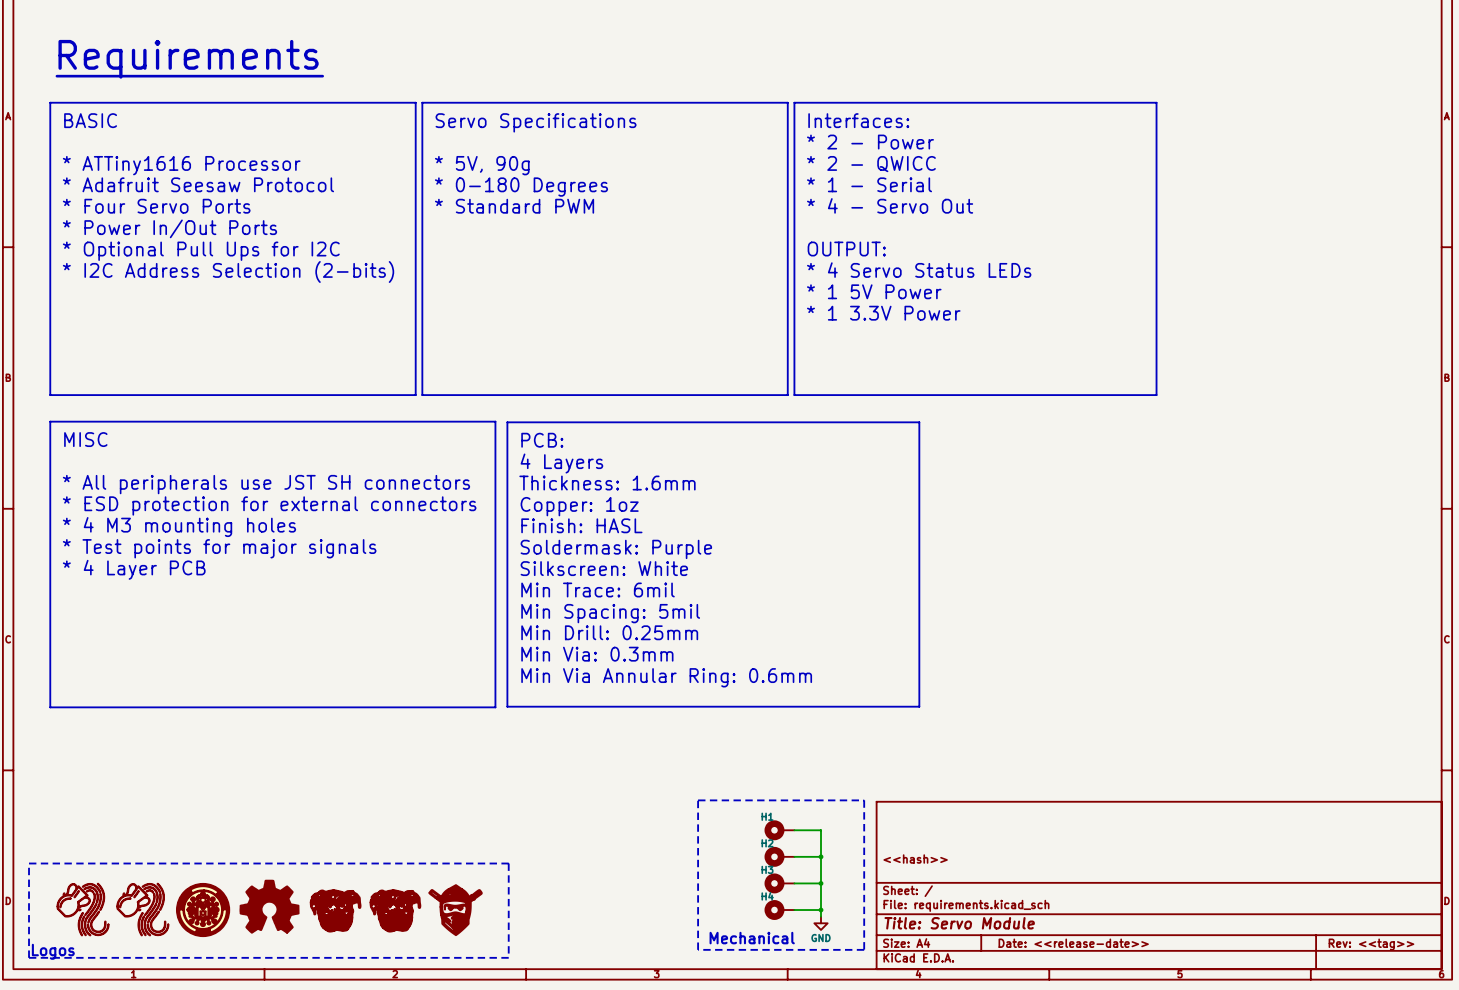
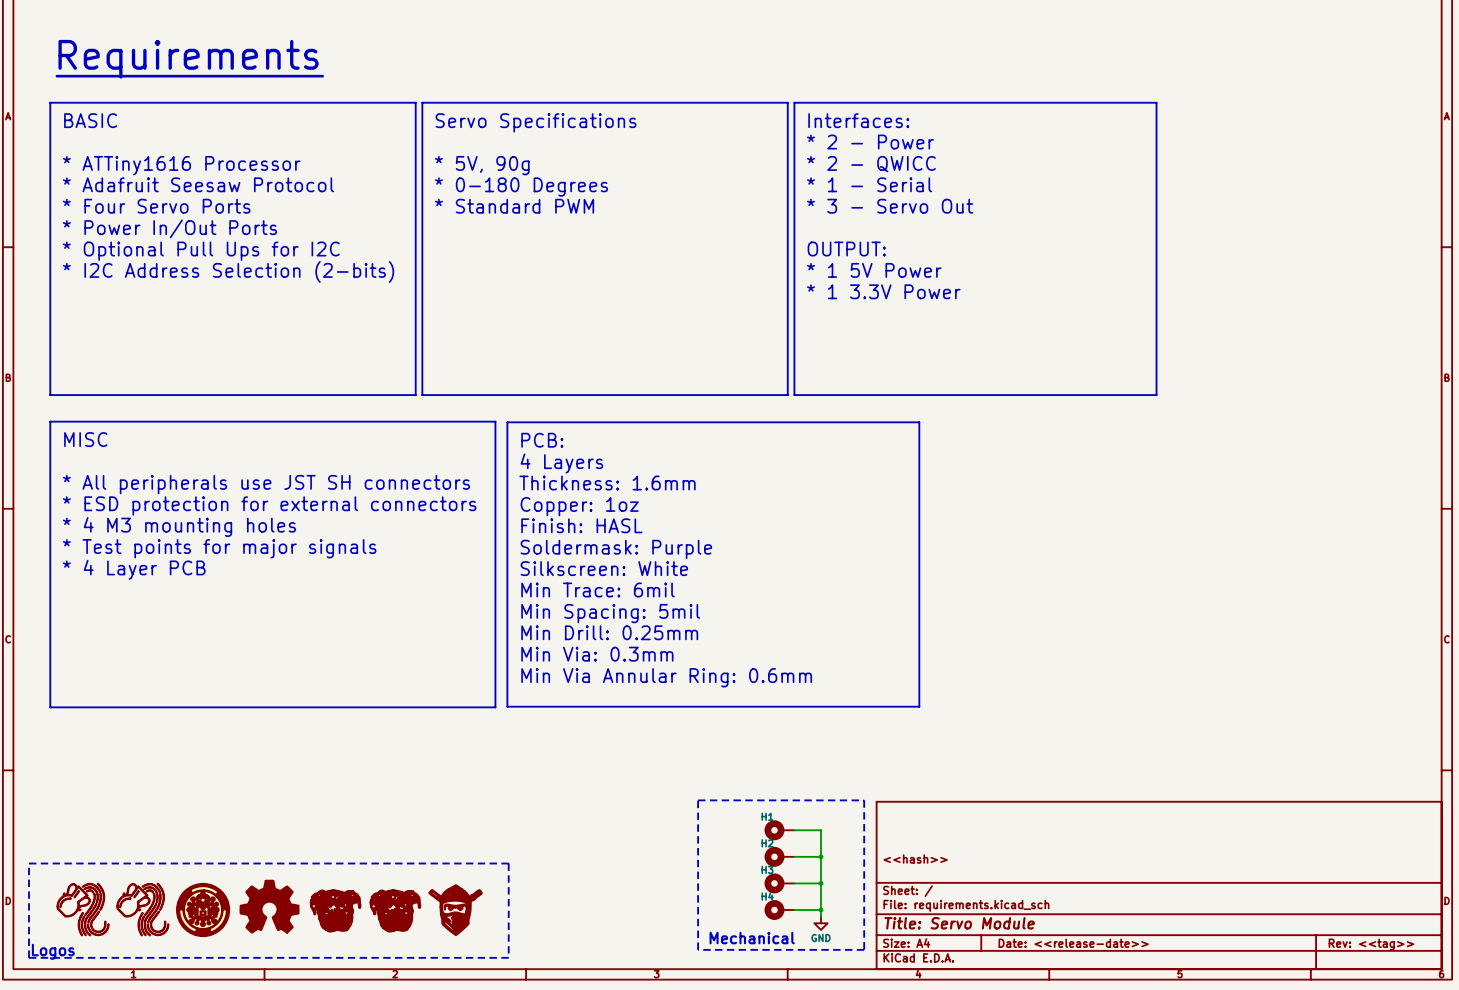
text: * 4 - Servo Out (890, 205) -> * 3 - Servo Out (890, 206)
text: * 4 Servo Status LEDs (919, 270) -> * 1 5V Power (874, 270)
text: * 1 5V Power (874, 291) -> * 1 3.3V Power (883, 291)
text: * 1 3.3V Power (883, 313) -> none

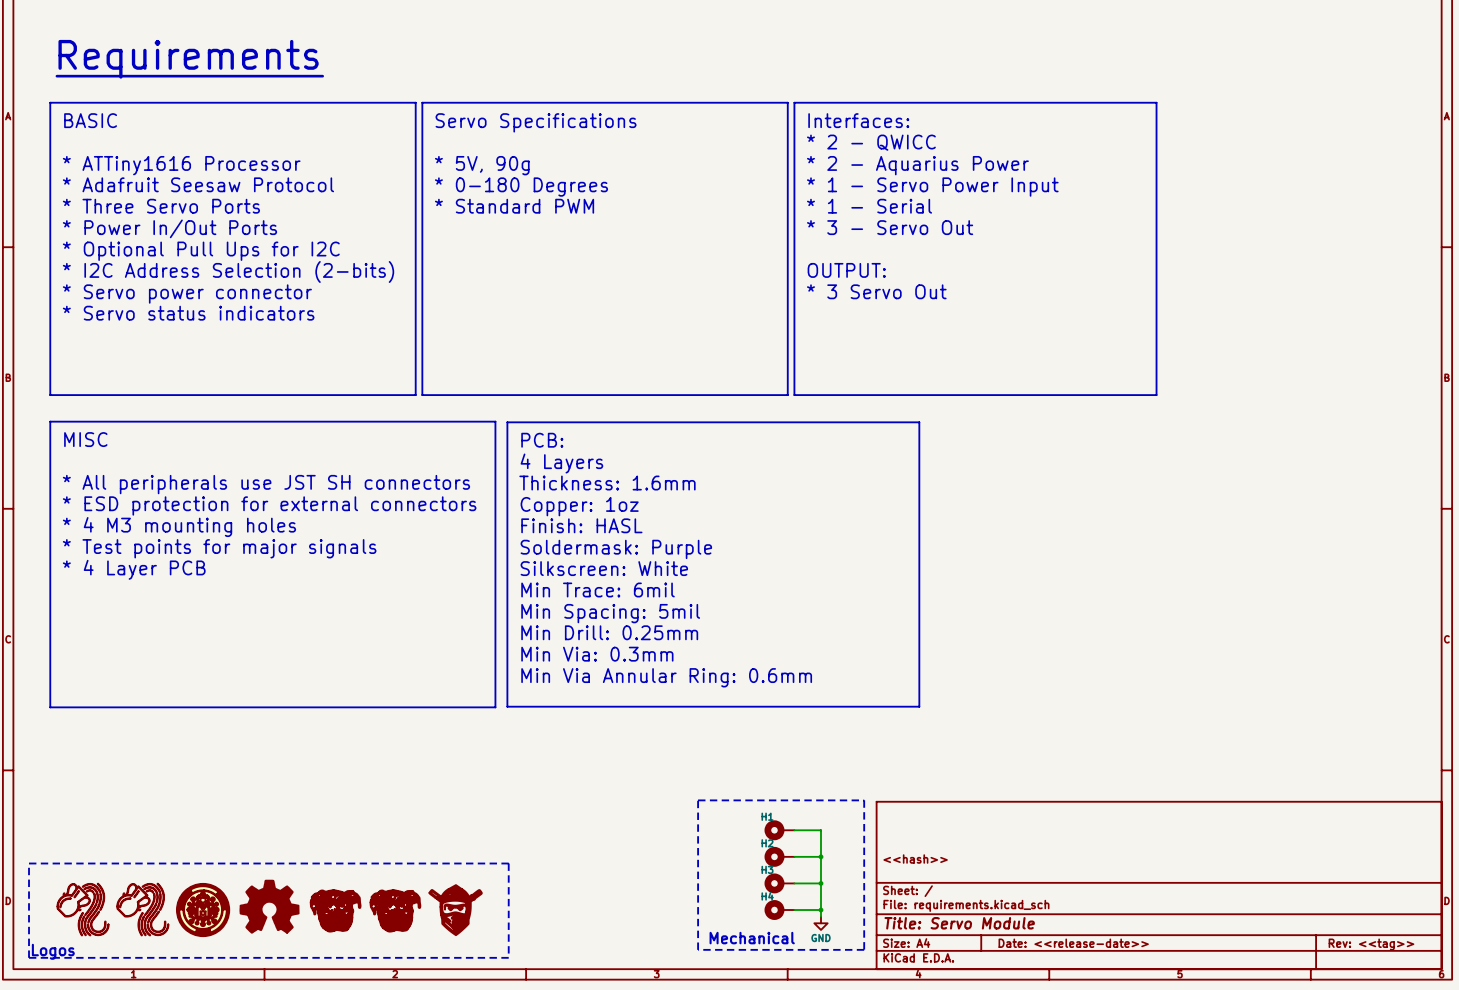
text: * 2 - Power (870, 142) -> * 2 - QWICC (871, 142)
text: * 2 - QWICC (871, 164) -> * 2 - Aquarius Power (917, 165)
text: * 1 - Serial (869, 184) -> * 1 - Servo Power Input (932, 187)
text: * Four Servo Ports (156, 206) -> * Three Servo Ports (161, 206)
text: * 3 - Servo Out (890, 206) -> * 1 - Serial (869, 206)
text: none -> * 3 - Servo Out (890, 227)
text: OUTPUT: (846, 249) -> none
text: * 1 5V Power (874, 270) -> OUTPUT: (846, 270)
text: * 1 3.3V Power (883, 291) -> * 3 Servo Out (876, 291)
text: none -> * Servo power connector (187, 294)
text: none -> * Servo status indicators (188, 313)

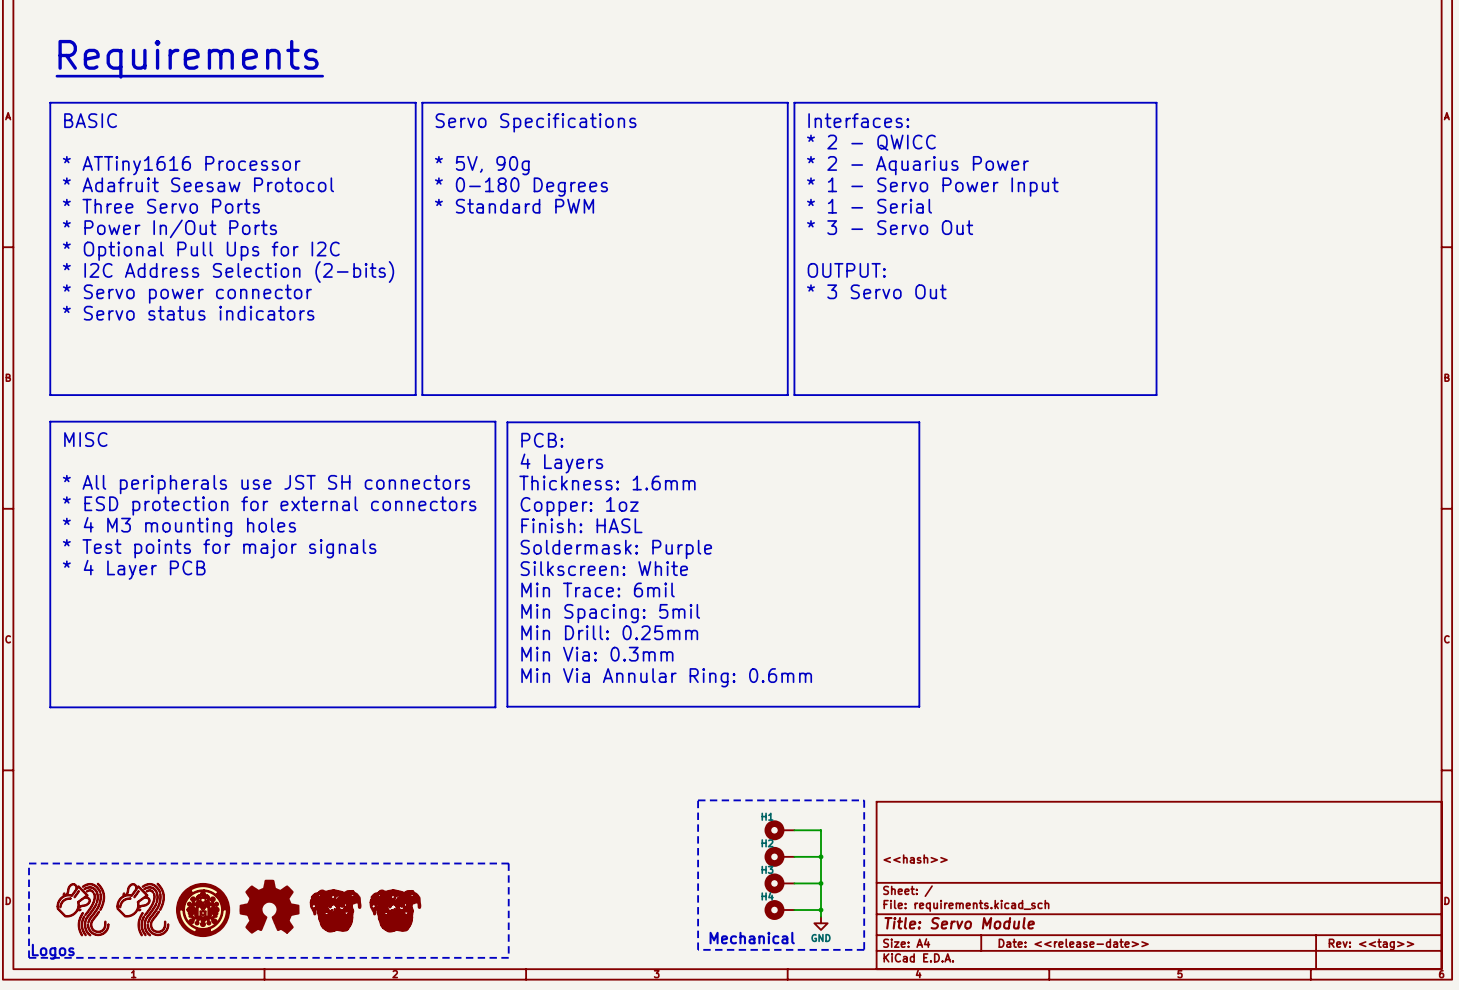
part: (455, 910) -> none

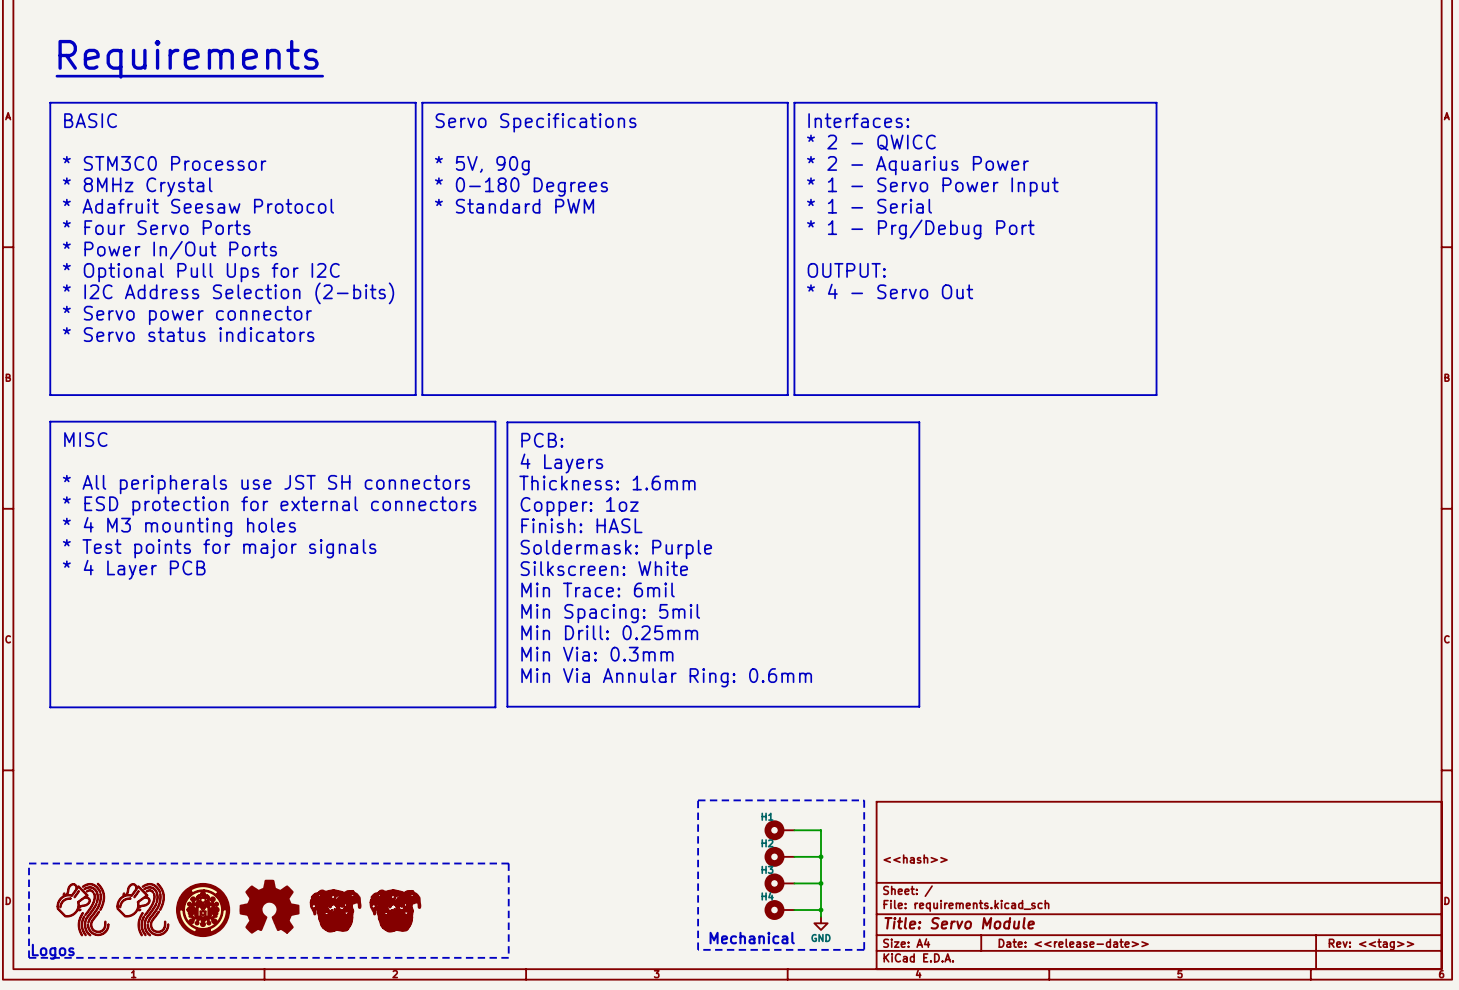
text: * ATTiny1616 Processor (181, 165) -> * STM3C0 Processor (164, 163)
text: * Adafruit Seesaw Protocol (198, 184) -> * 8MHz Crystal (137, 187)
text: * Three Servo Ports (161, 206) -> * Adafruit Seesaw Protocol (198, 206)
text: * 3 - Servo Out (890, 227) -> * 1 - Prg/Debug Port (920, 229)
text: * Power In/Out Ports (169, 228) -> * Four Servo Ports (156, 227)
text: * Optional Pull Ups for I2C (201, 251) -> * Power In/Out Ports (169, 250)
text: * I2C Address Selection (2-bits) (228, 271) -> * Optional Pull Ups for I2C (201, 272)
text: * 3 Servo Out (876, 291) -> * 4 - Servo Out (890, 291)
text: * Servo power connector (187, 294) -> * I2C Address Selection (2-bits) (228, 293)
text: * Servo status indicators (188, 313) -> * Servo power connector (187, 315)
text: none -> * Servo status indicators (188, 334)

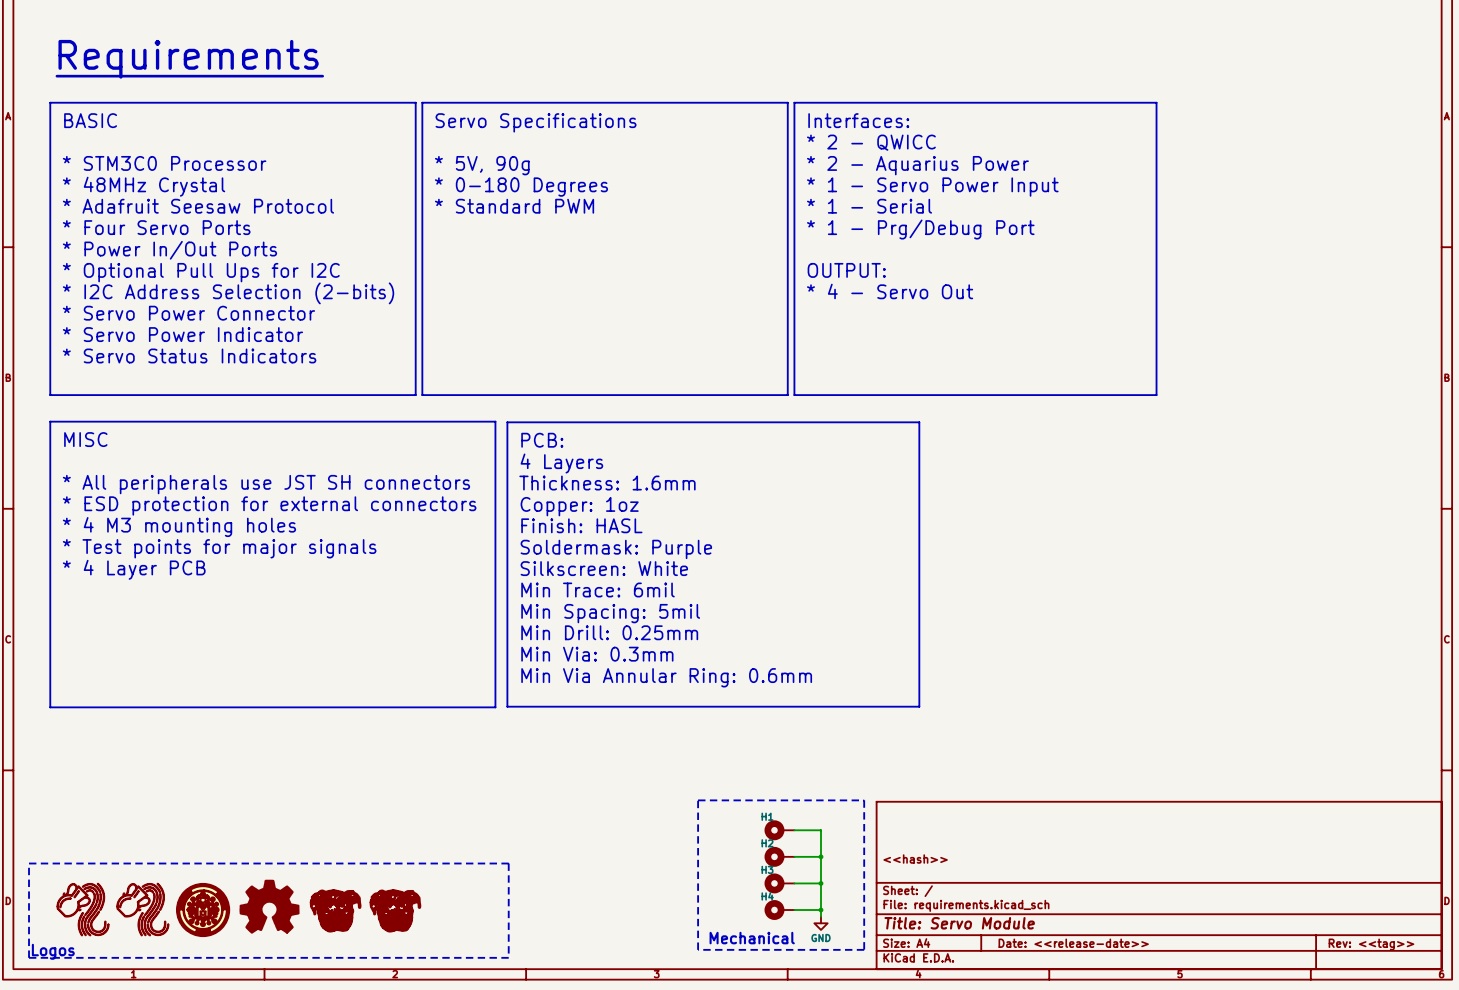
text: * 8MHz Crystal (137, 187) -> * 48MHz Crystal (144, 186)
text: * Servo power connector (187, 315) -> * Servo Power Connector (188, 313)
text: * Servo status indicators (188, 334) -> * Servo Power Indicator (182, 334)
text: none -> * Servo Status Indicators (189, 355)

